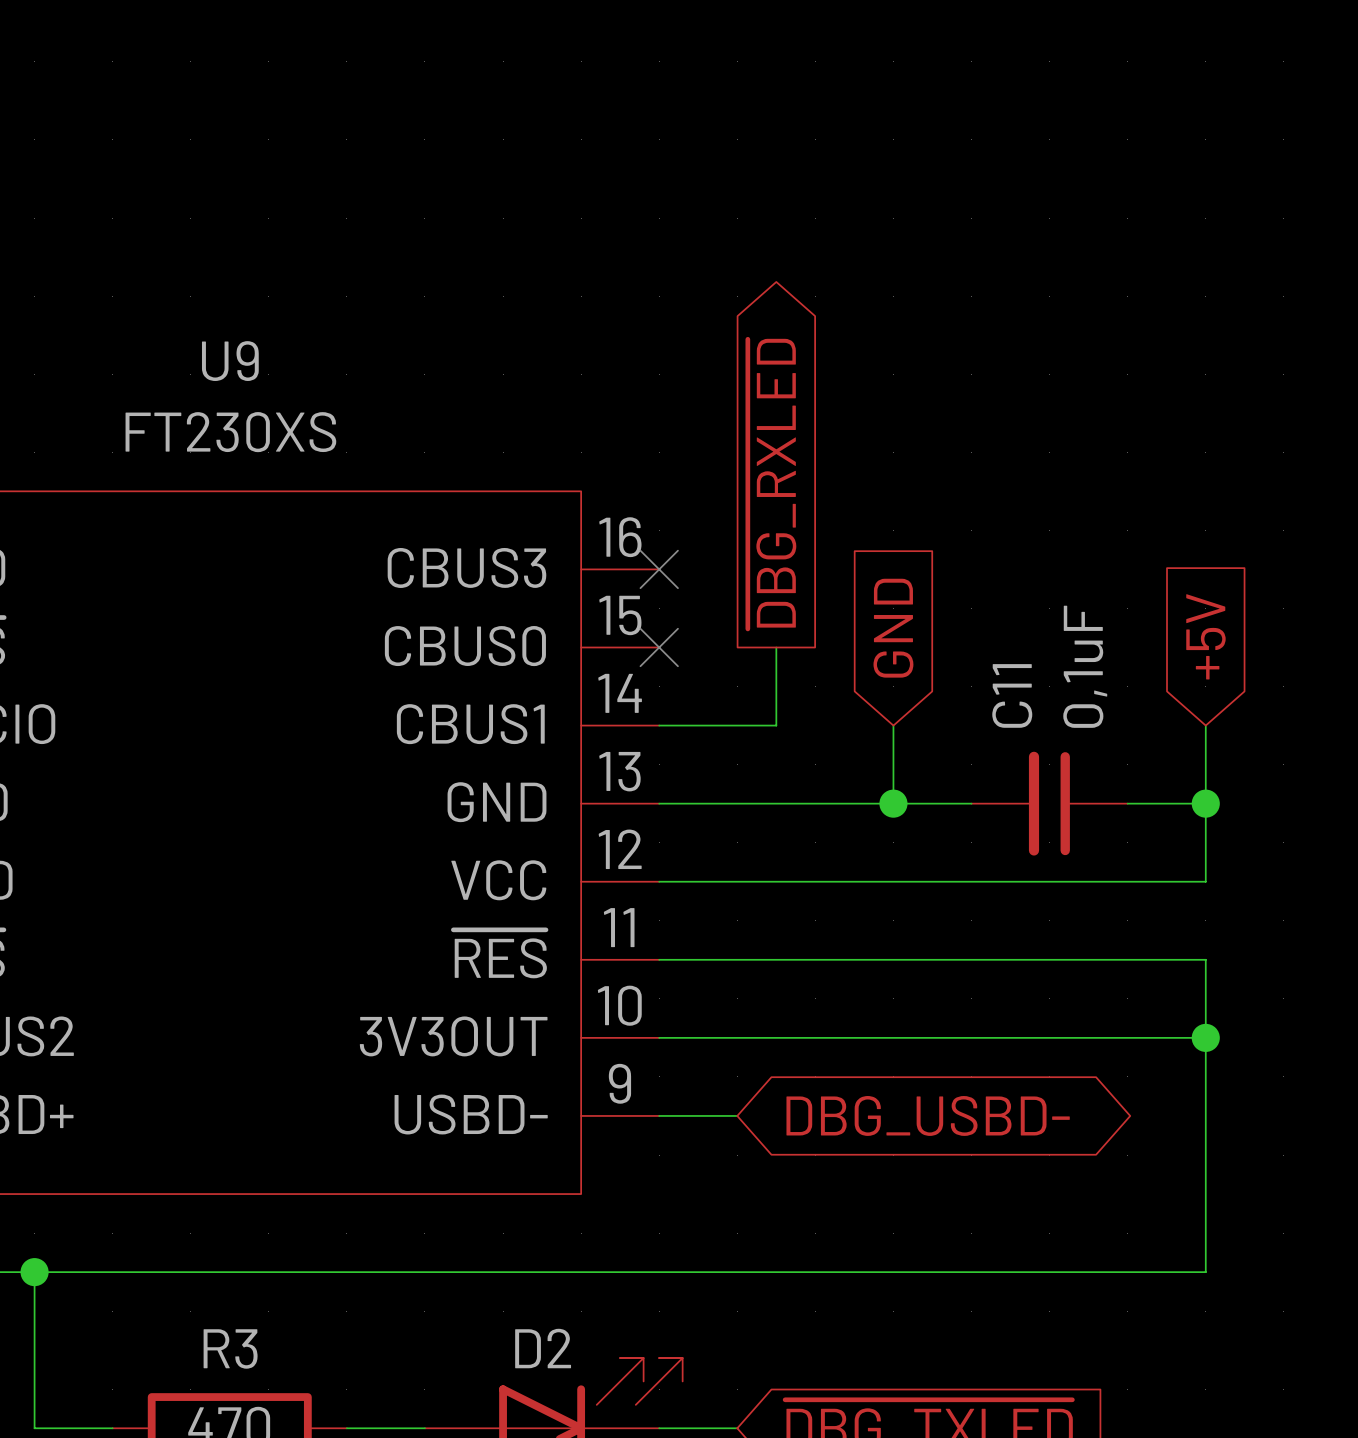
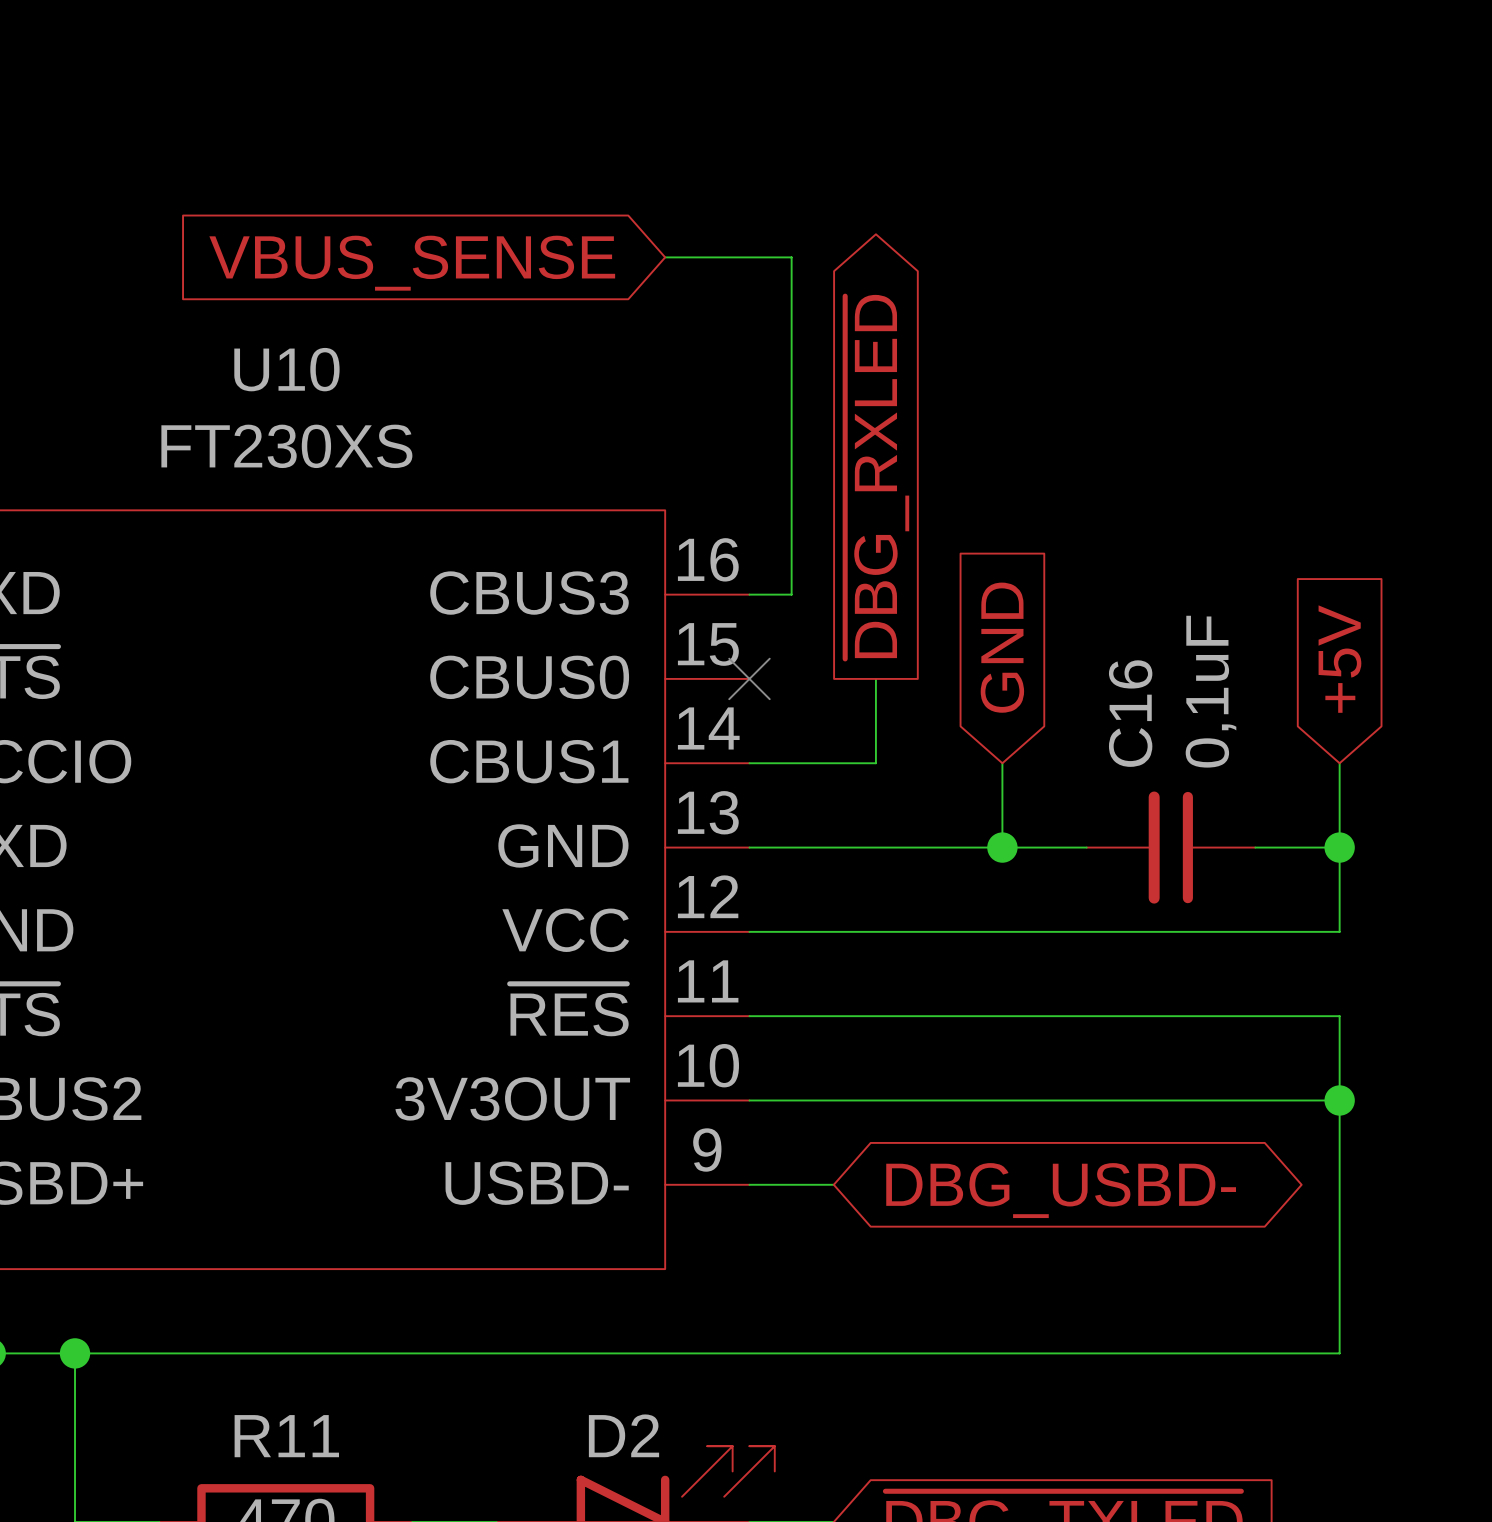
global label: none -> VBUS_SENSE (412, 263)
wire: none -> (665, 257) (791, 257) (791, 594) (749, 594)
U9 name: U9 (230, 361) -> U10 (286, 369)
no-connect mark: (659, 569) -> none
C11 name: C11 (1012, 695) -> C16 (1130, 713)
R3 name: R3 (230, 1348) -> R11 (286, 1436)

